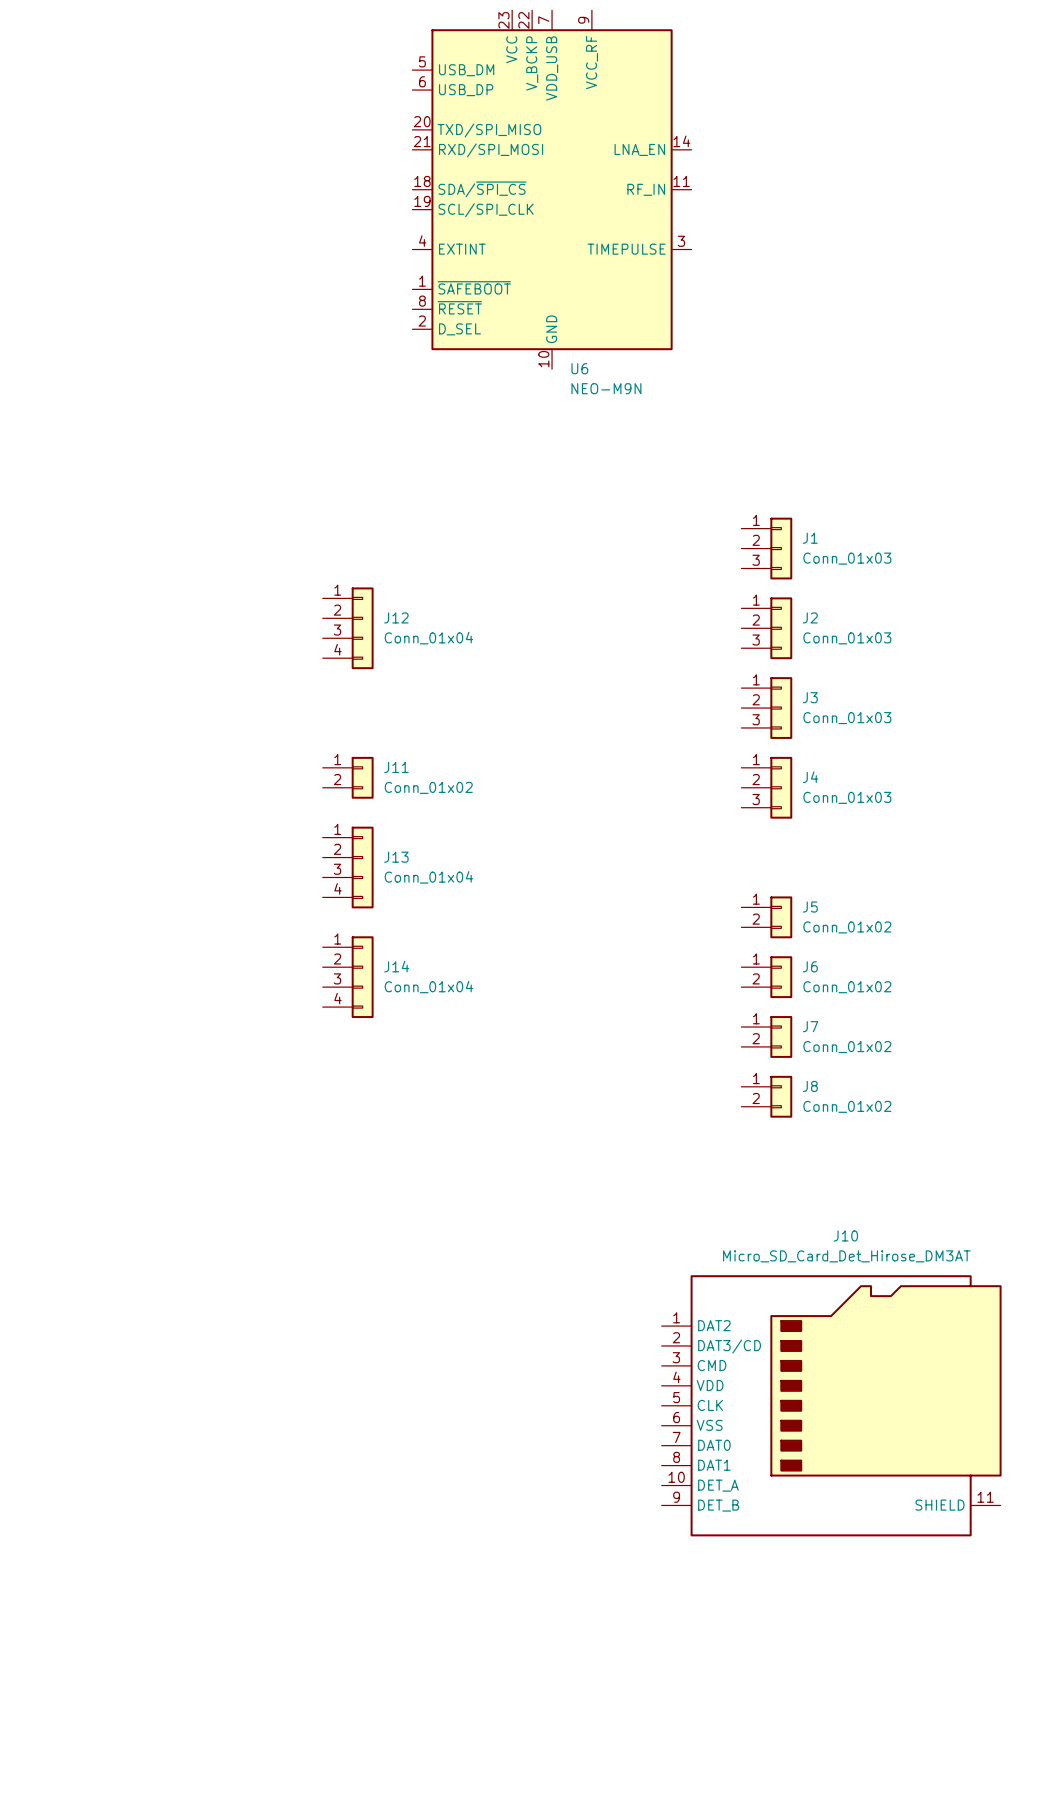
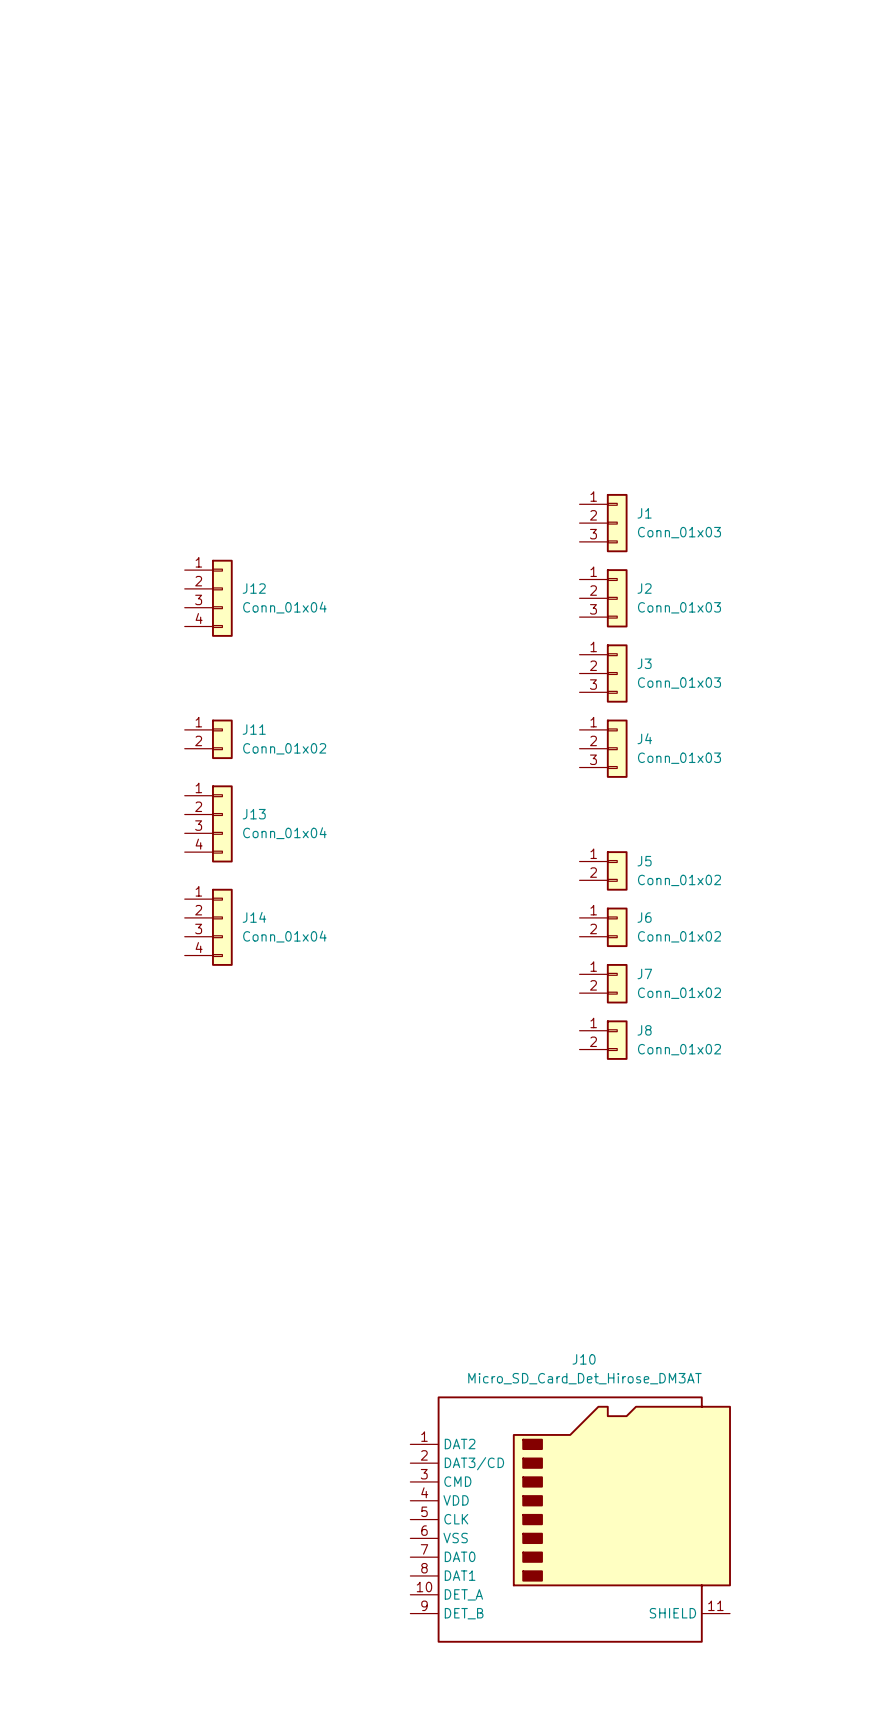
U6: NEO-M9N (552, 189) -> none
J10 position: (831, 1405) -> (570, 1519)

